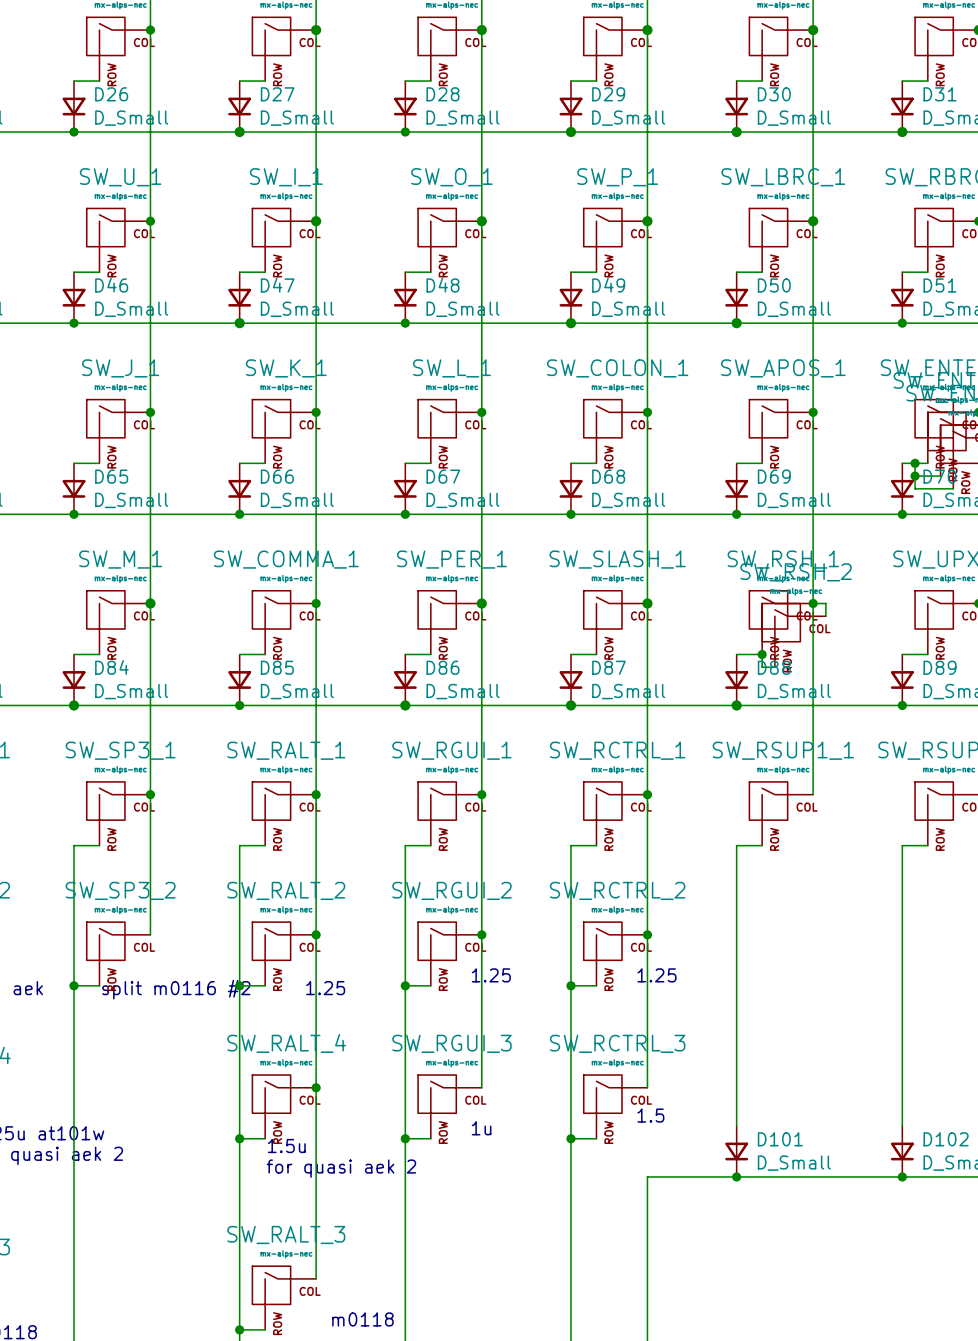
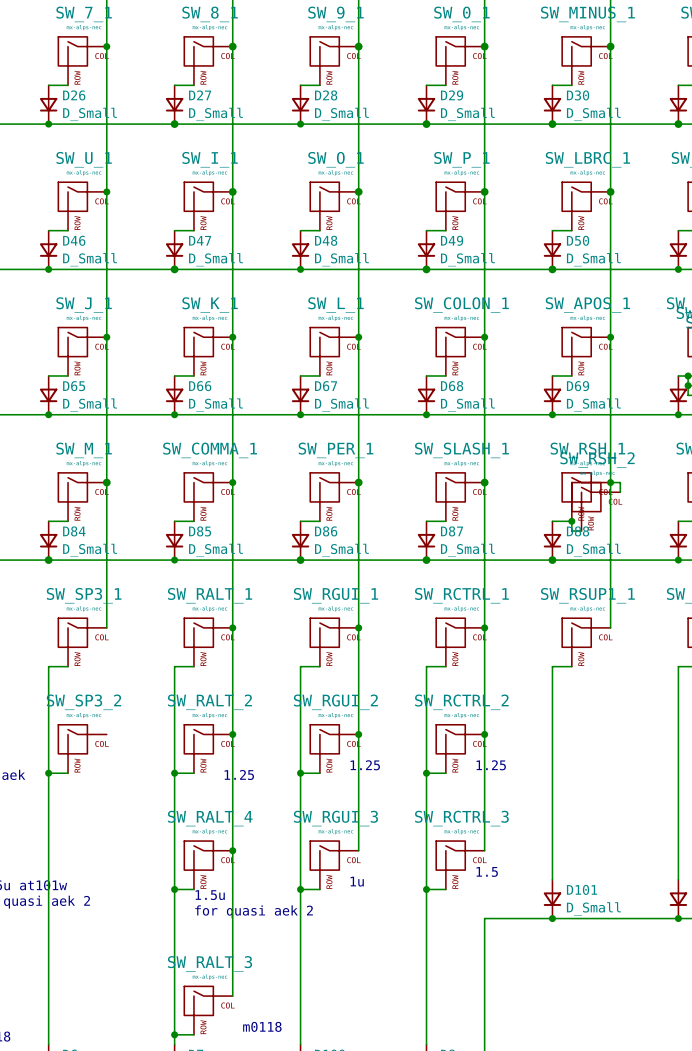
wire: (150, 794) (150, 934) -> none
junction: (150, 794) -> none
text: split m0116 #2 (176, 989) -> none

